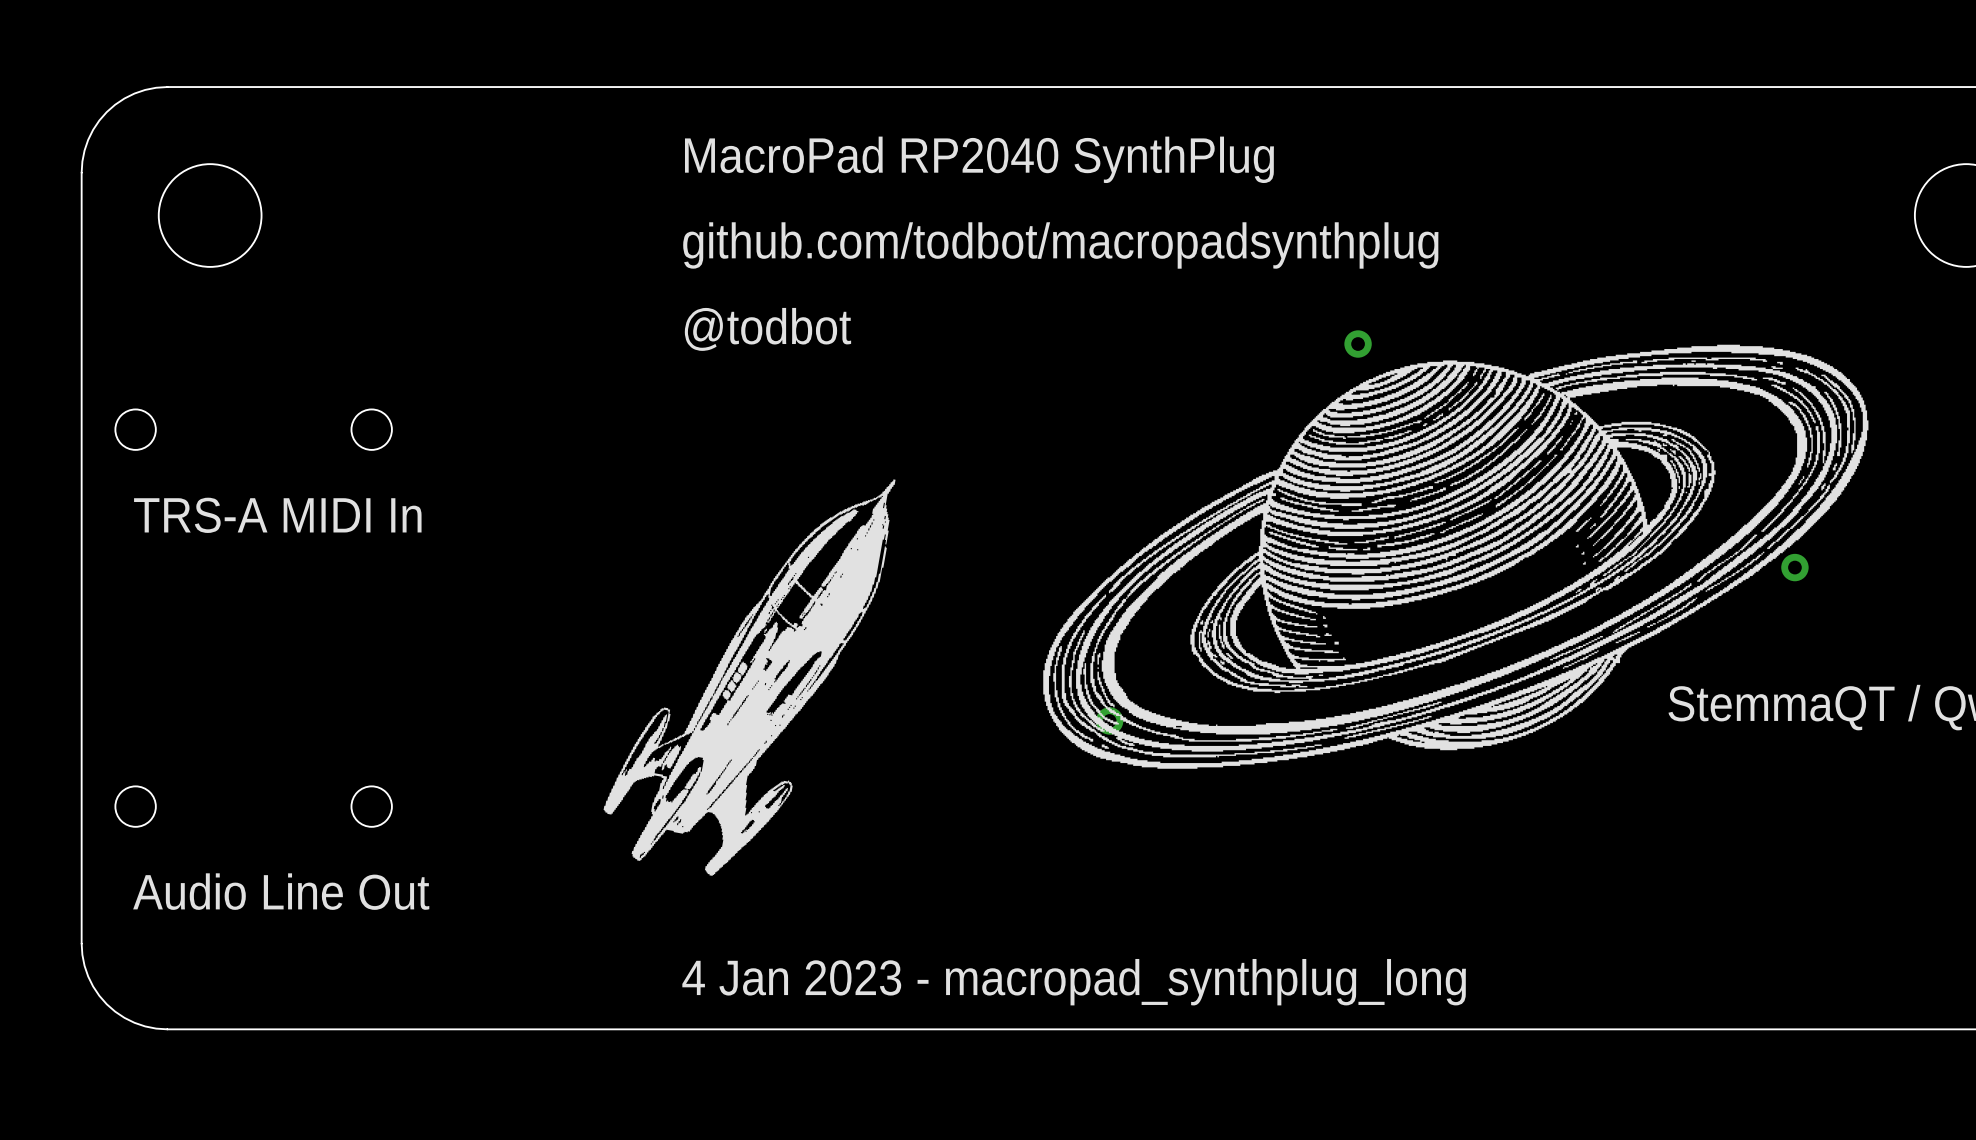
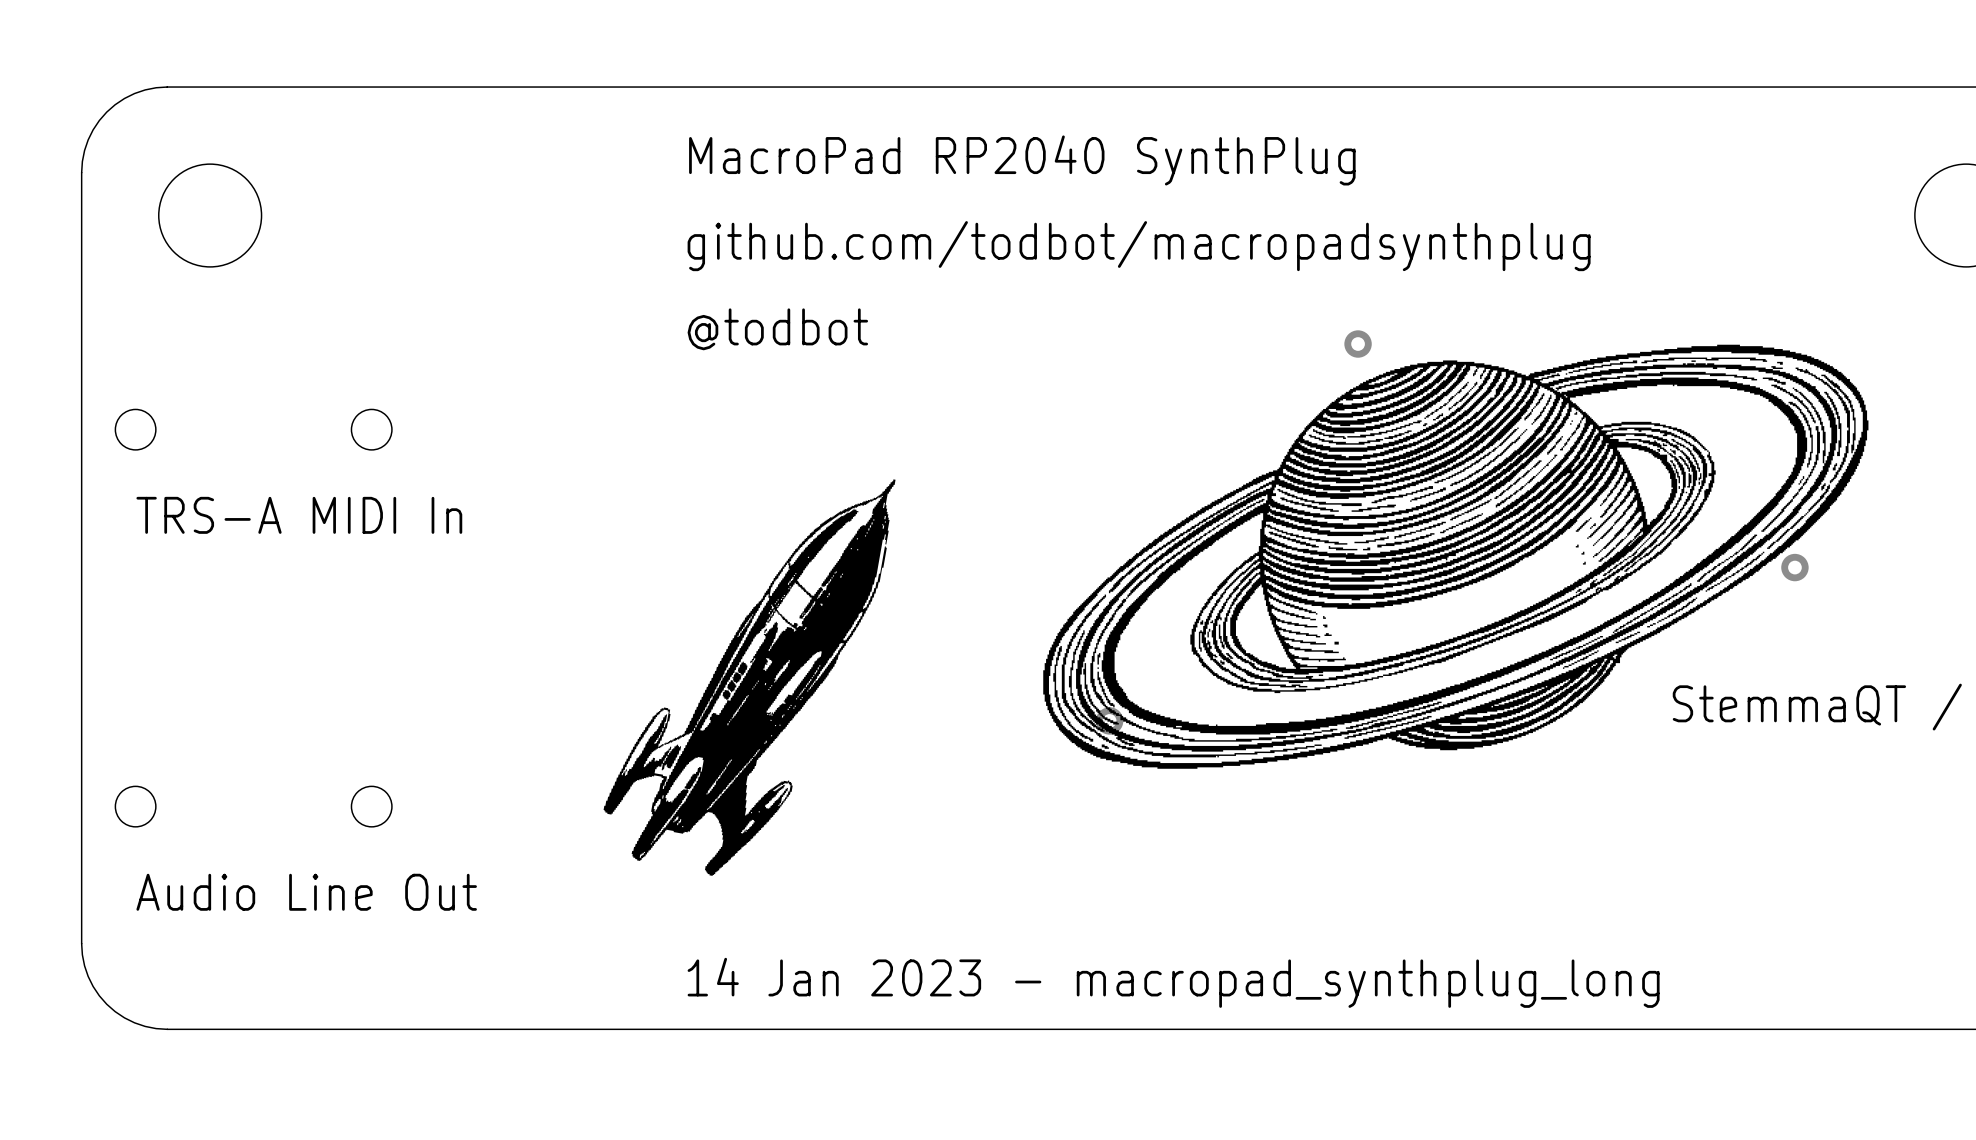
text: 4 Jan 2023 - macropad_synthplug_long (1074, 982) -> 14 Jan 2023 - macropad_synthplug_long (1173, 982)

